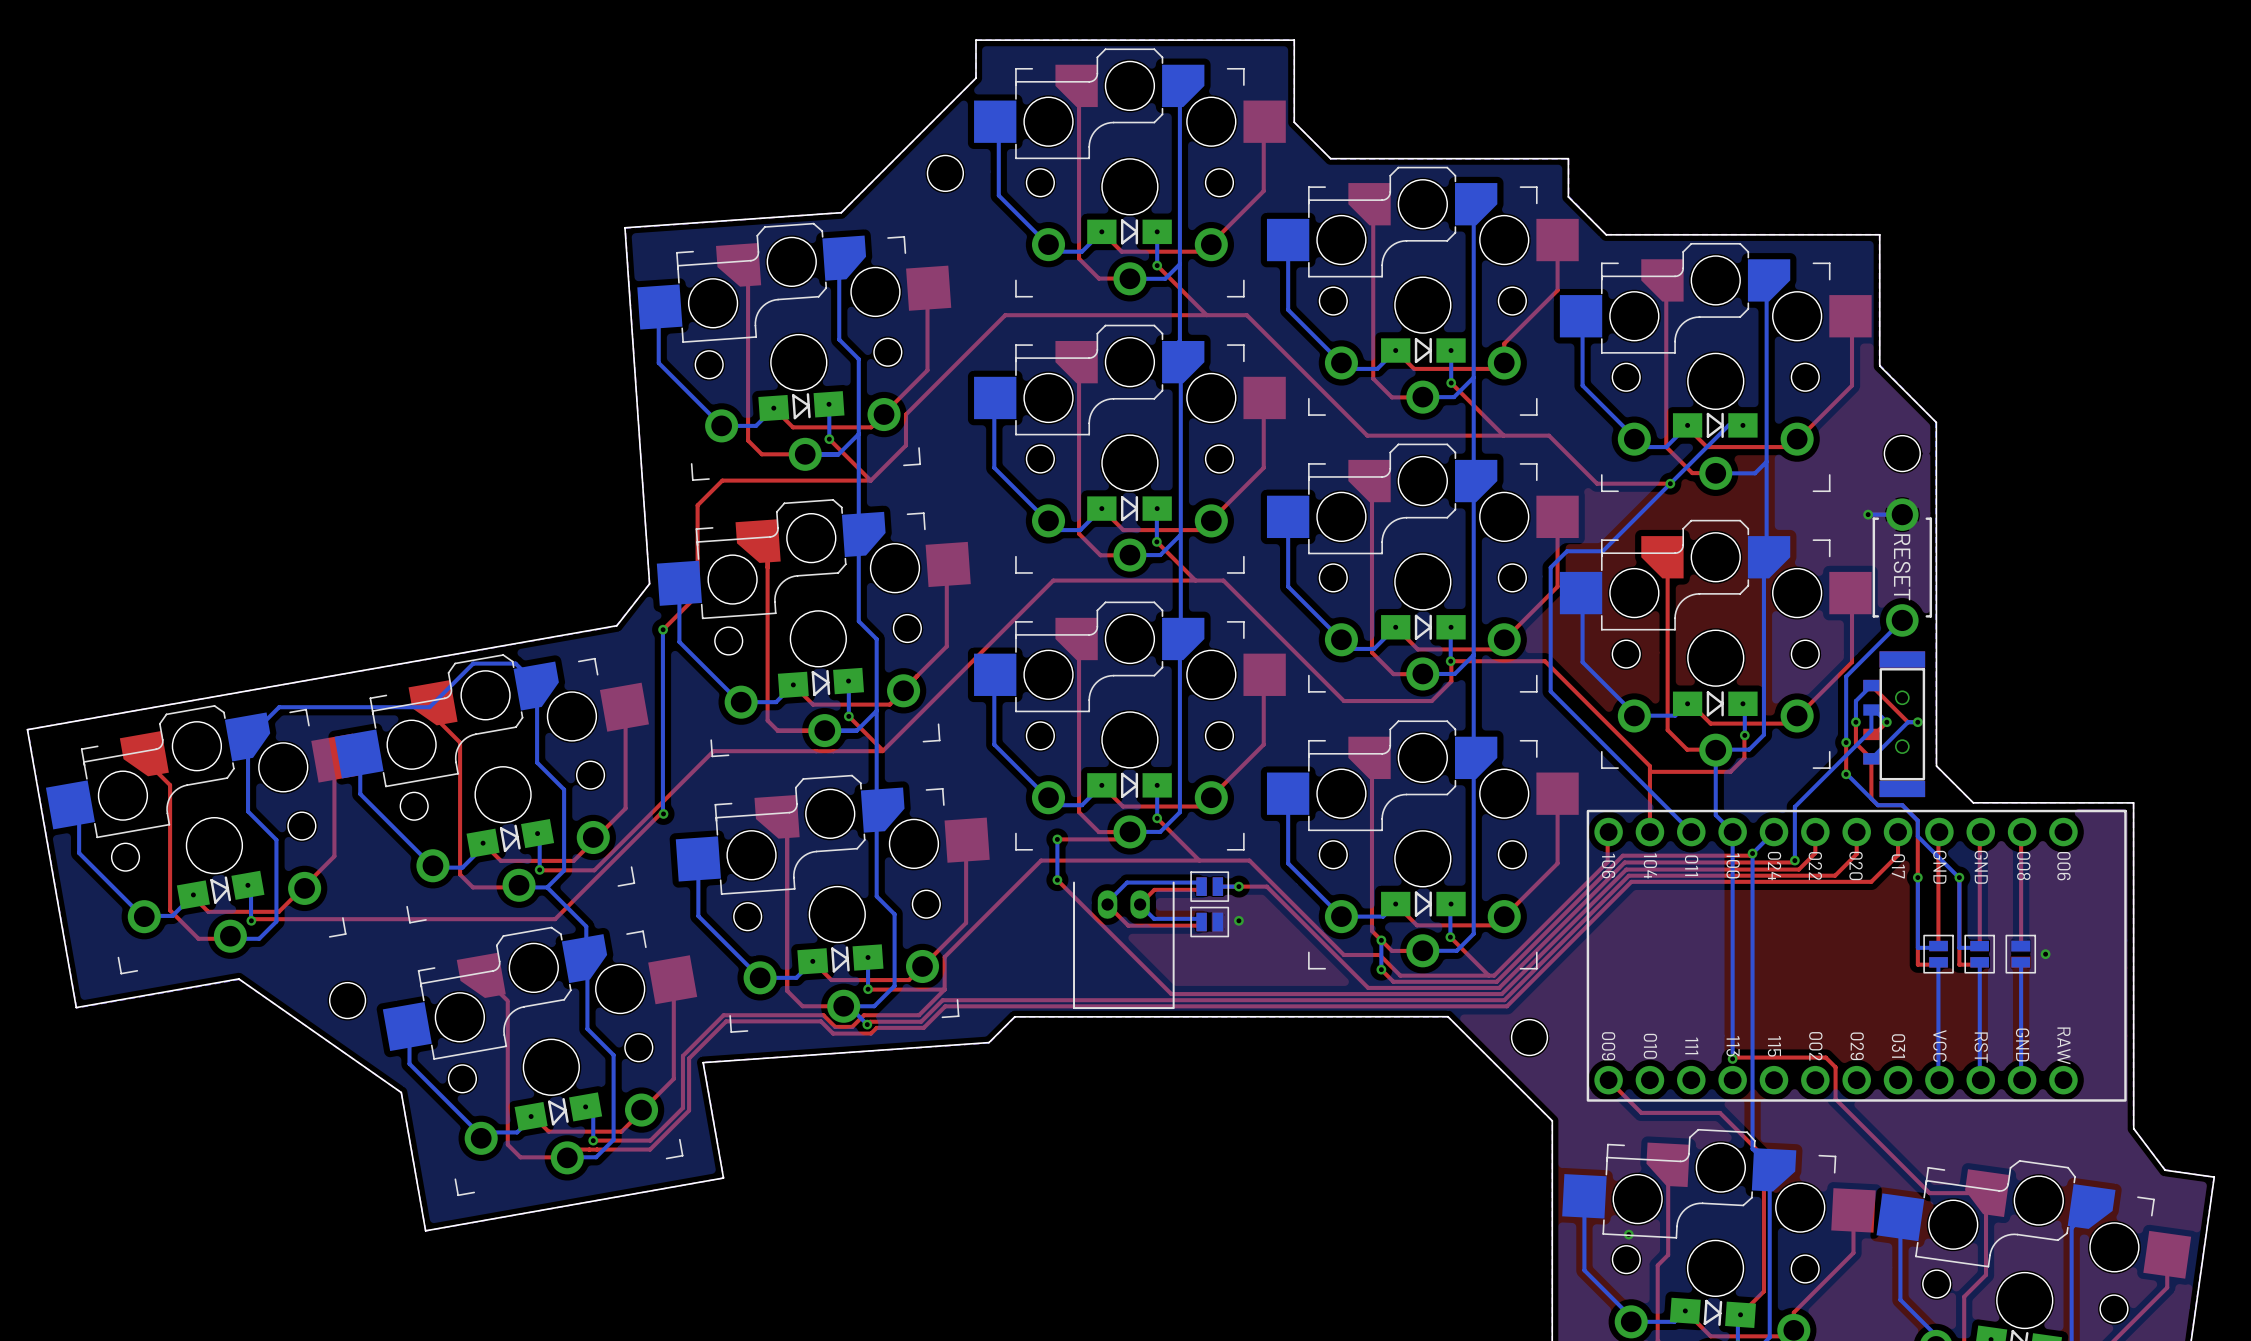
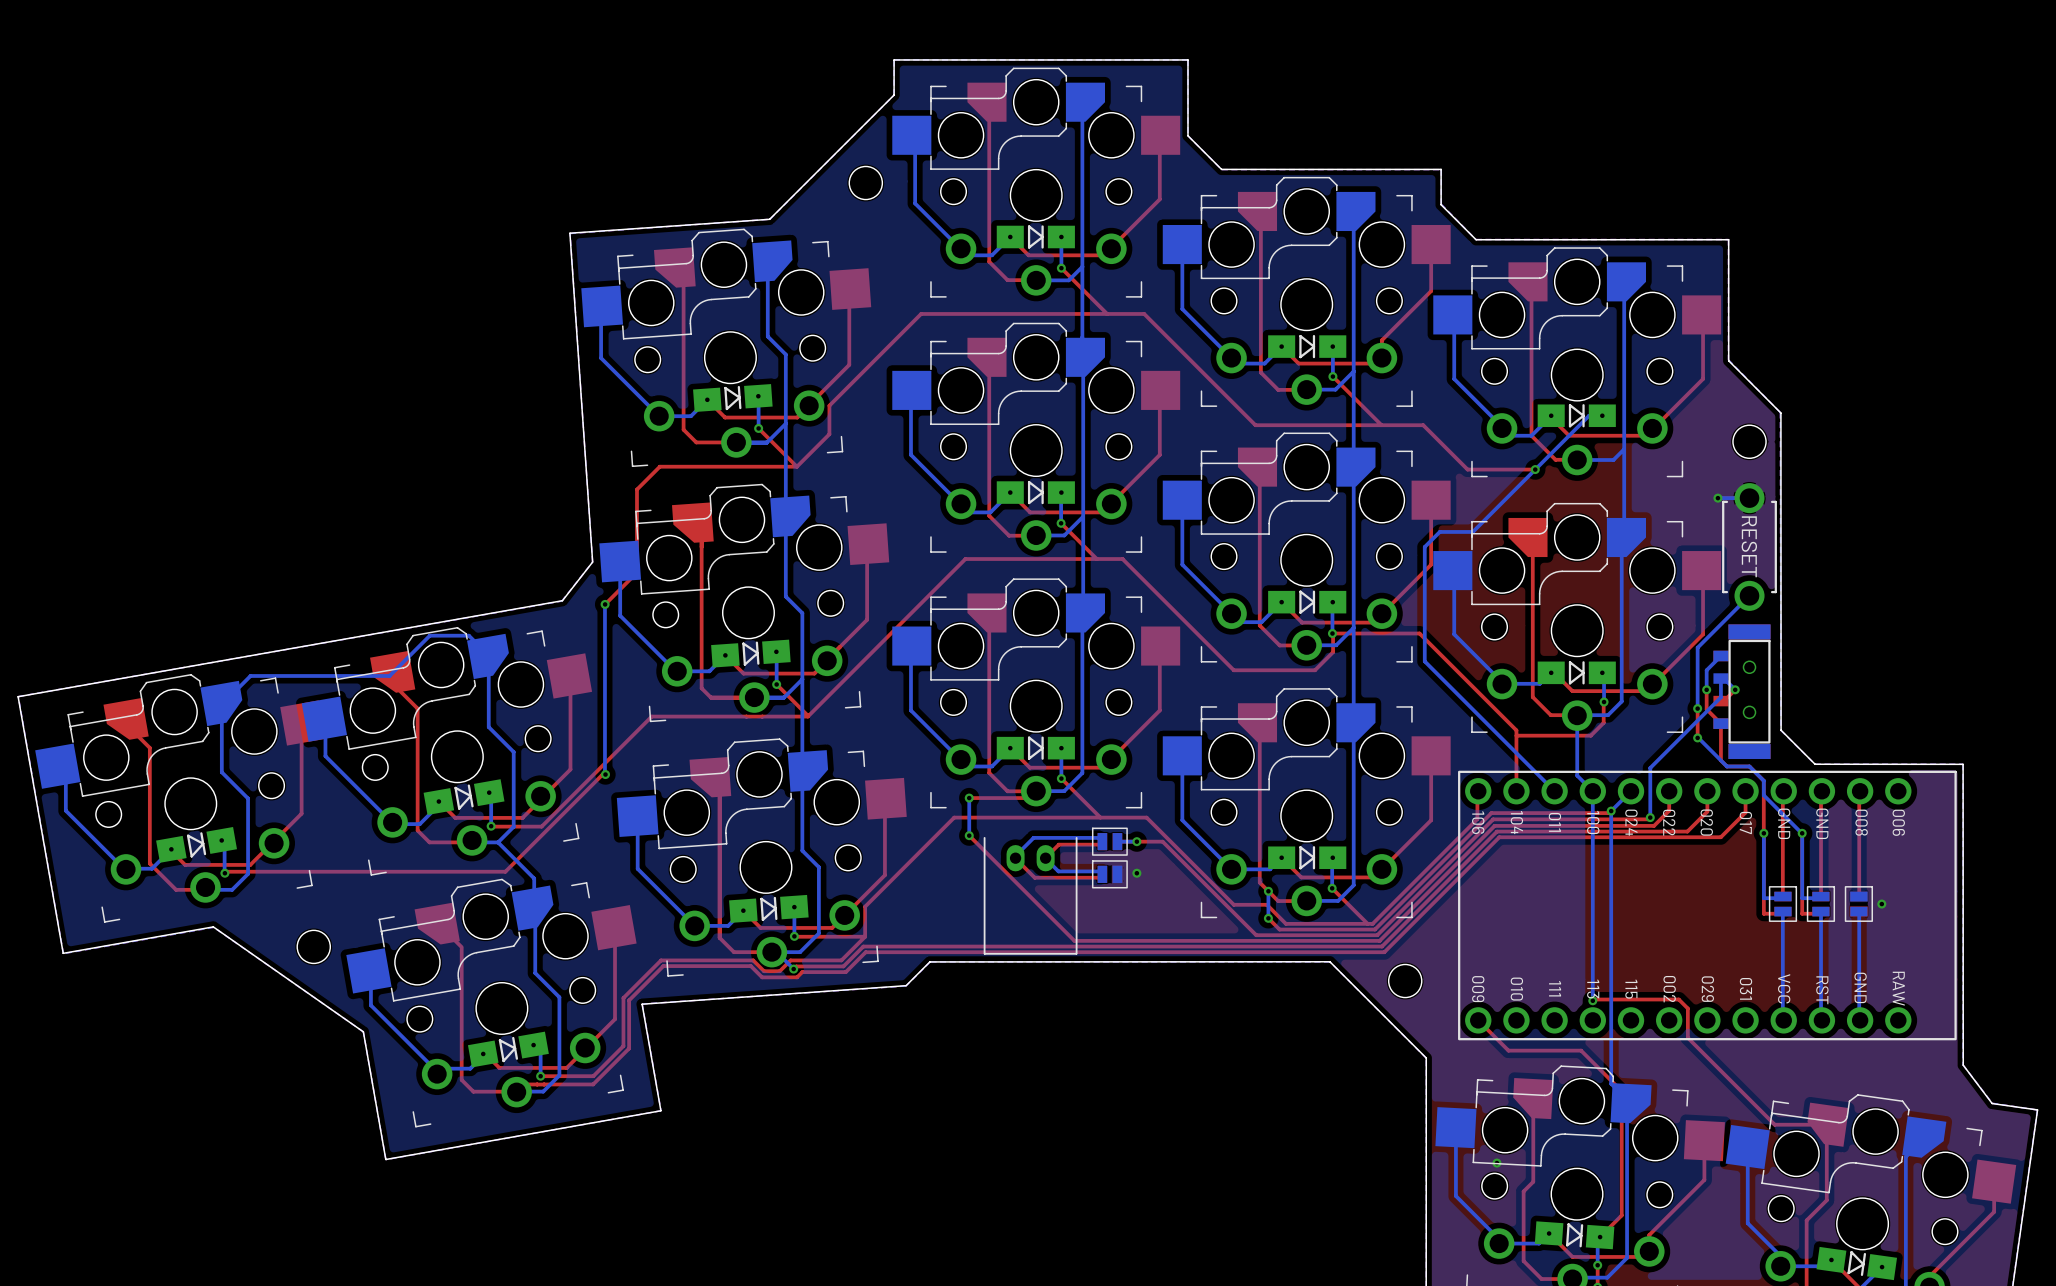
top track: (1871, 685) (1908, 722) (1917, 722) -> none
bottom track: (1917, 722) (1908, 722) (1871, 758) -> none
via: (1917, 722) -> none

